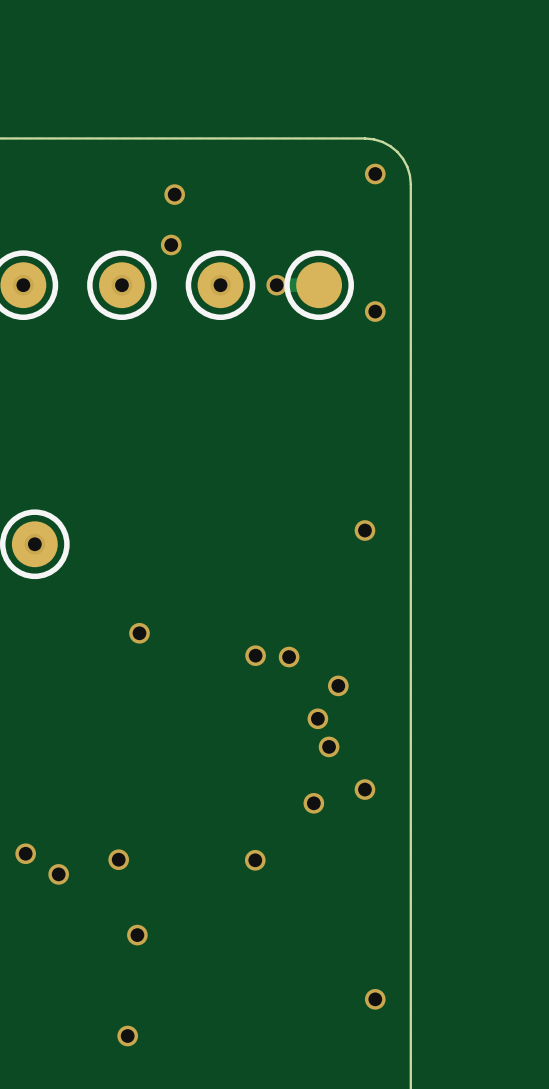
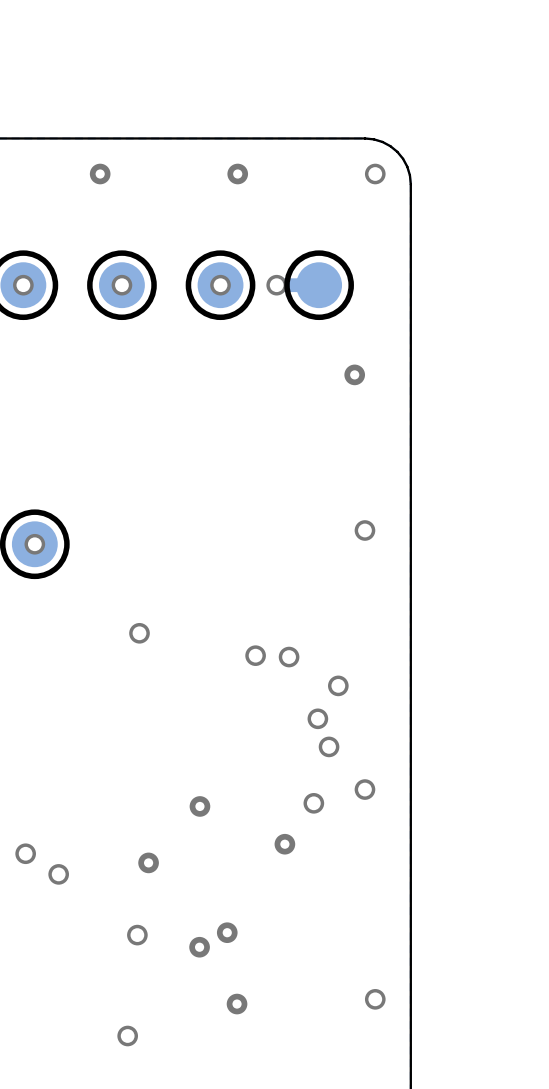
via: none -> (100, 174)
via: none -> (237, 174)
via: (174, 194) -> none
via: (171, 245) -> none
via: (375, 311) -> none
via: none -> (354, 374)
via: none -> (199, 806)
via: none -> (284, 844)
via: (118, 859) -> none
via: (255, 860) -> none
via: none -> (148, 862)
via: none -> (227, 932)
via: none -> (199, 947)
via: none -> (237, 1004)

